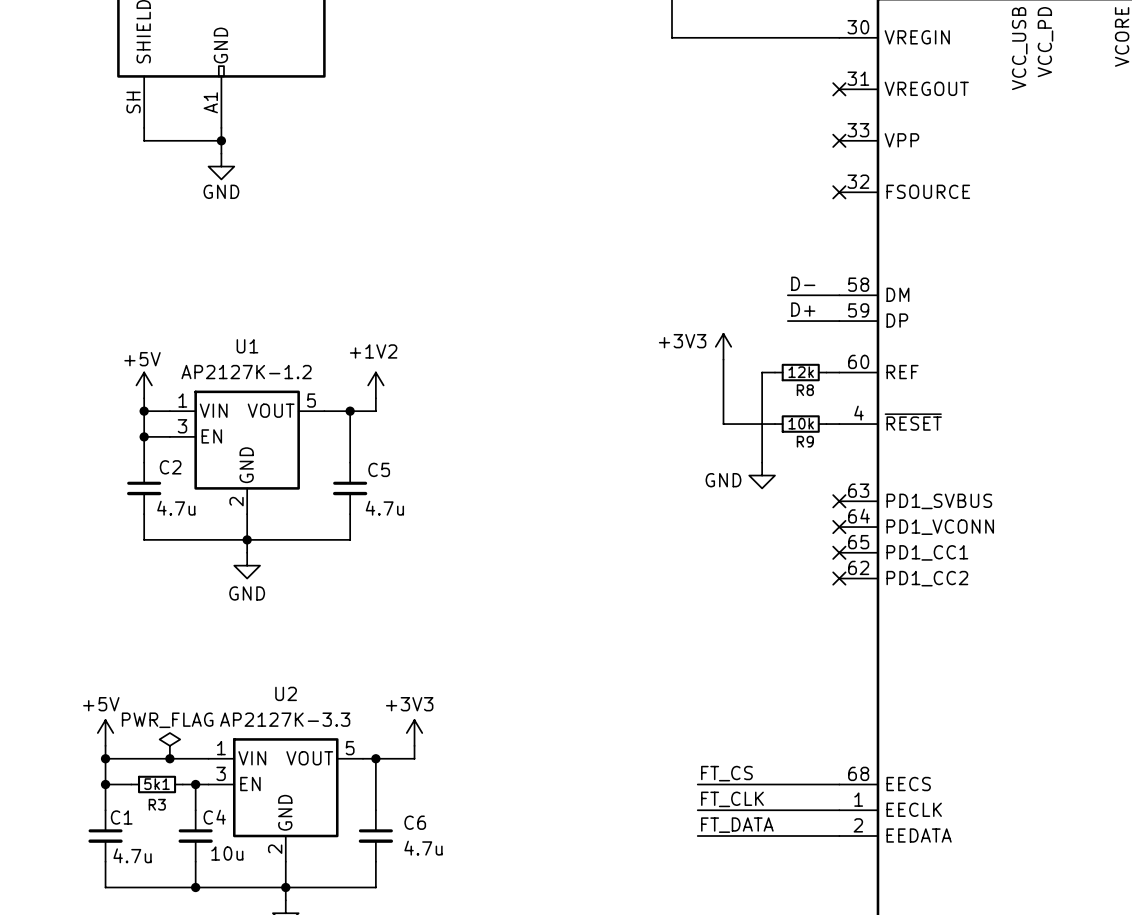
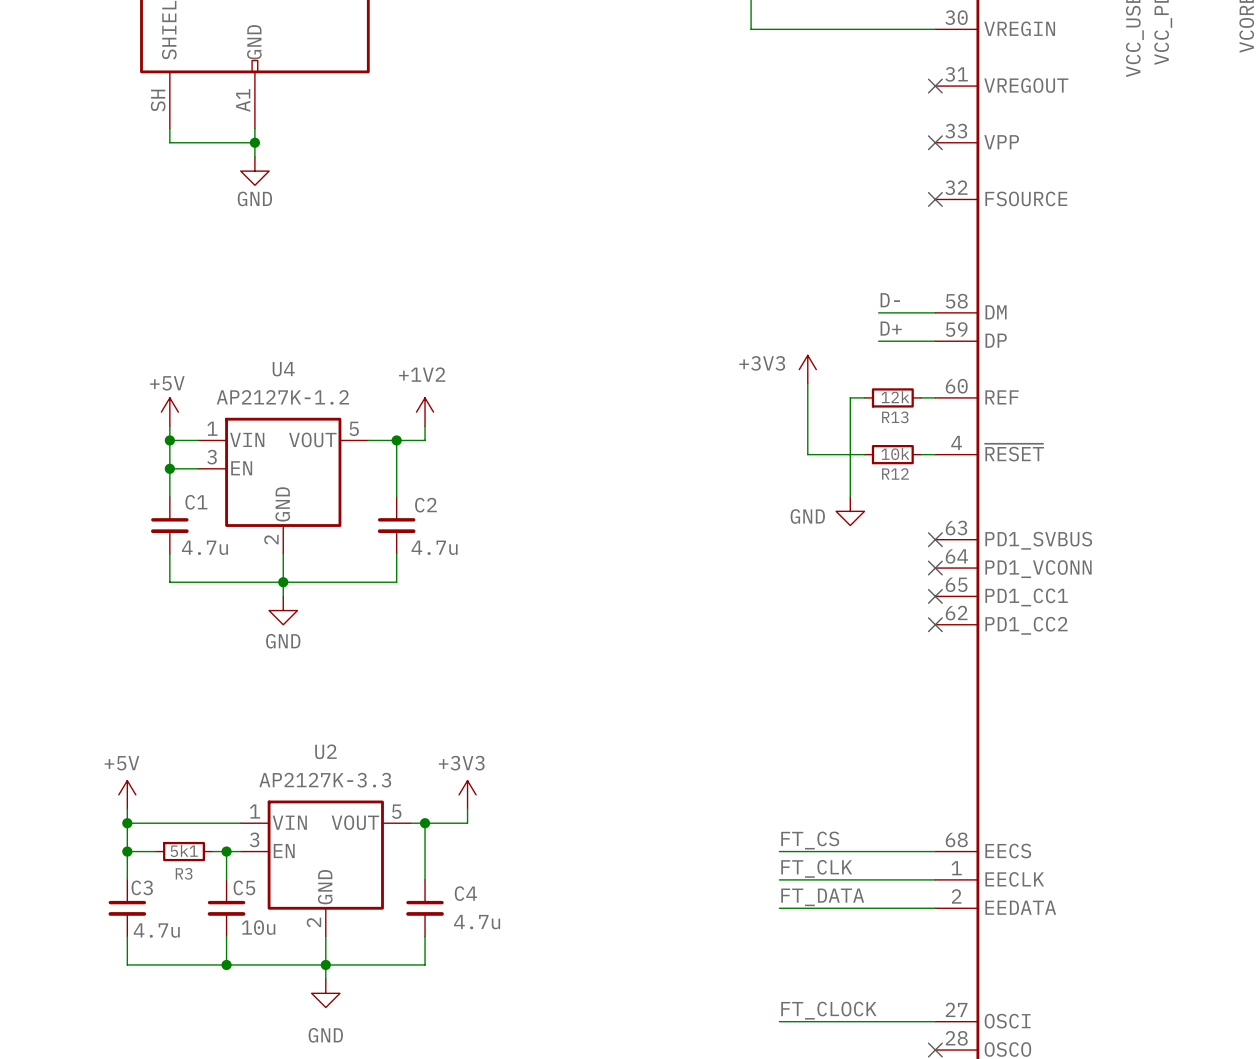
U1 name: U1 (247, 346) -> U4 (283, 369)
R8 name: R8 (805, 390) -> R13 (895, 417)
R9 name: R9 (805, 441) -> R12 (895, 473)
C2 name: C2 (170, 467) -> C1 (196, 502)
C5 name: C5 (379, 469) -> C2 (425, 505)
power symbol: PWR_FLAG (169, 745) -> none
junction: (169, 758) -> none
C1 name: C1 (121, 817) -> C3 (142, 887)
C4 name: C4 (214, 817) -> C5 (244, 887)
C6 name: C6 (415, 822) -> C4 (465, 893)

